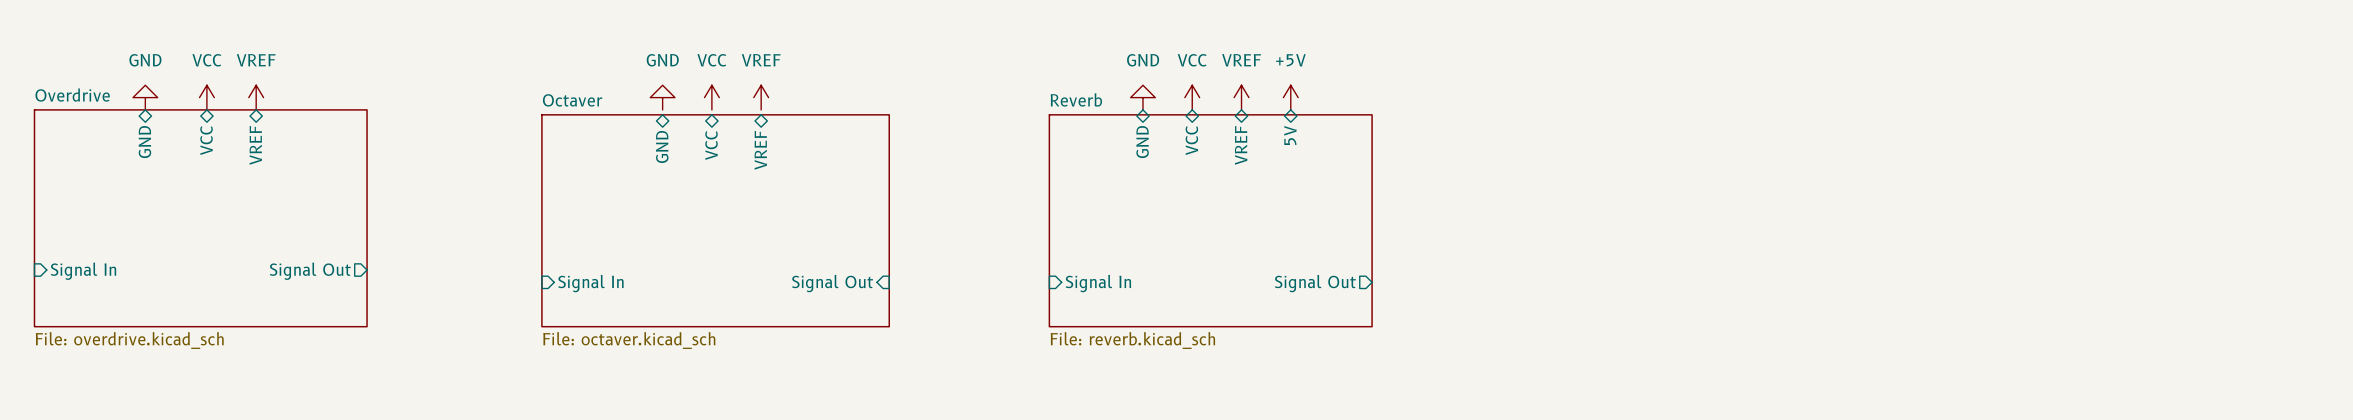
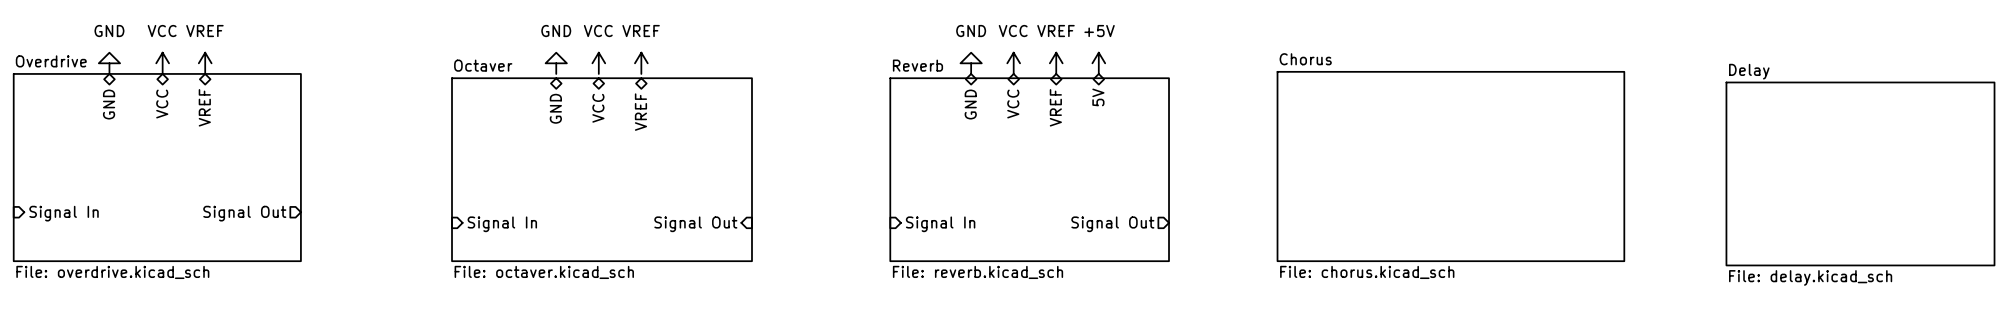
sheet Chorus: none -> File: chorus.kicad_sch (1450, 166)
sheet Delay: none -> File: delay.kicad_sch (1860, 173)

